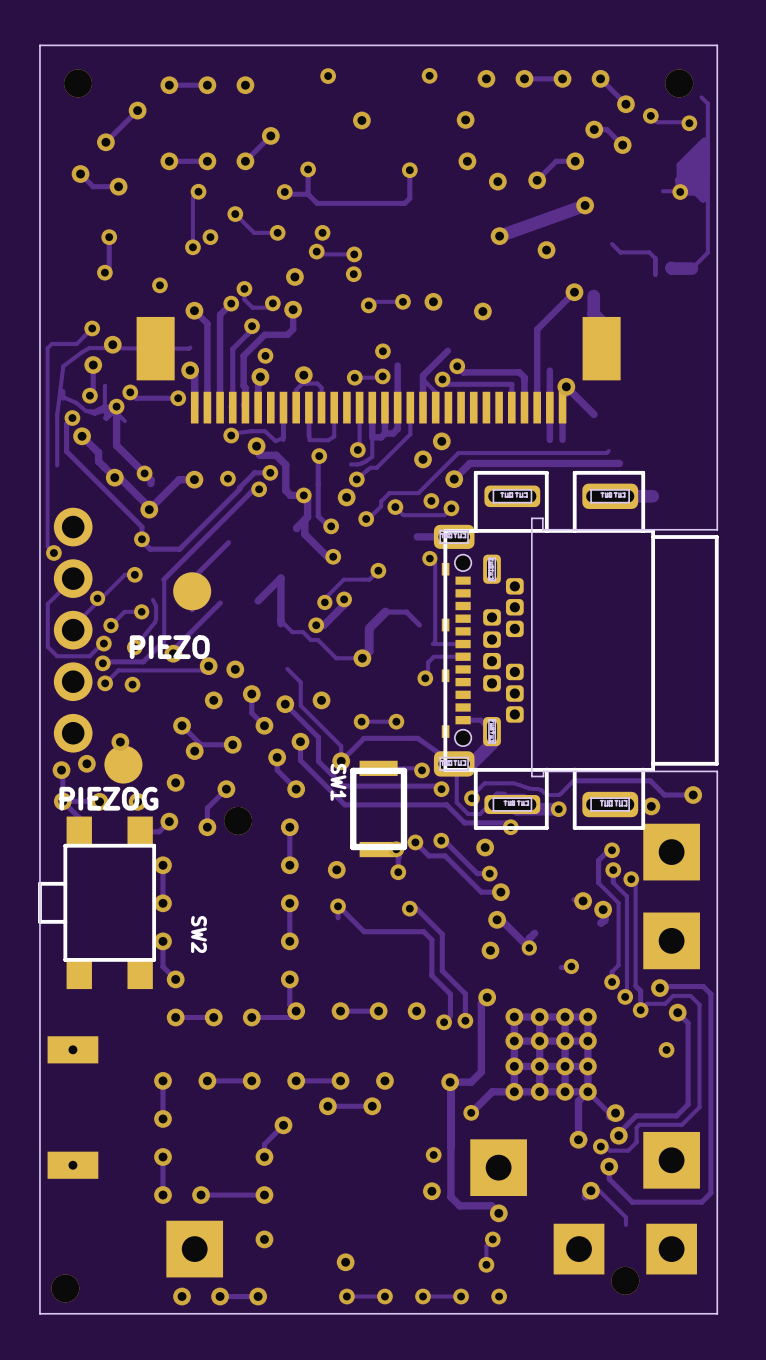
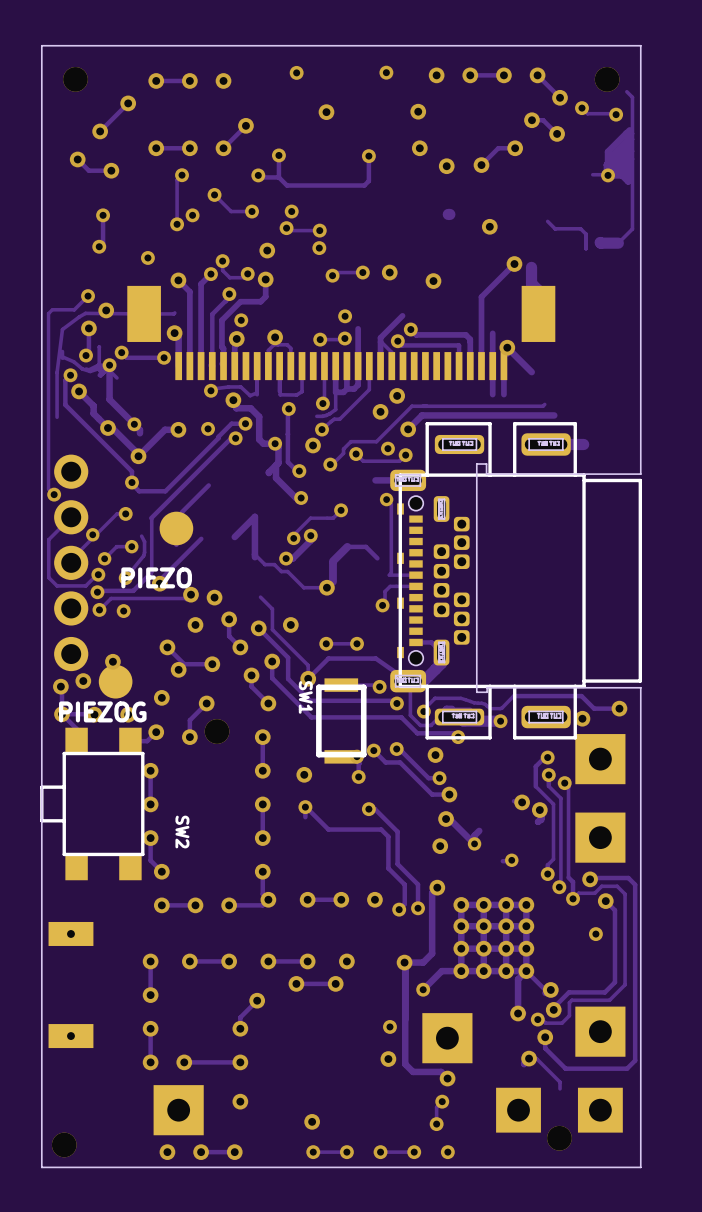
track: (585, 205) (499, 236) -> none
via: (585, 205) -> none
via: (499, 236) -> none

